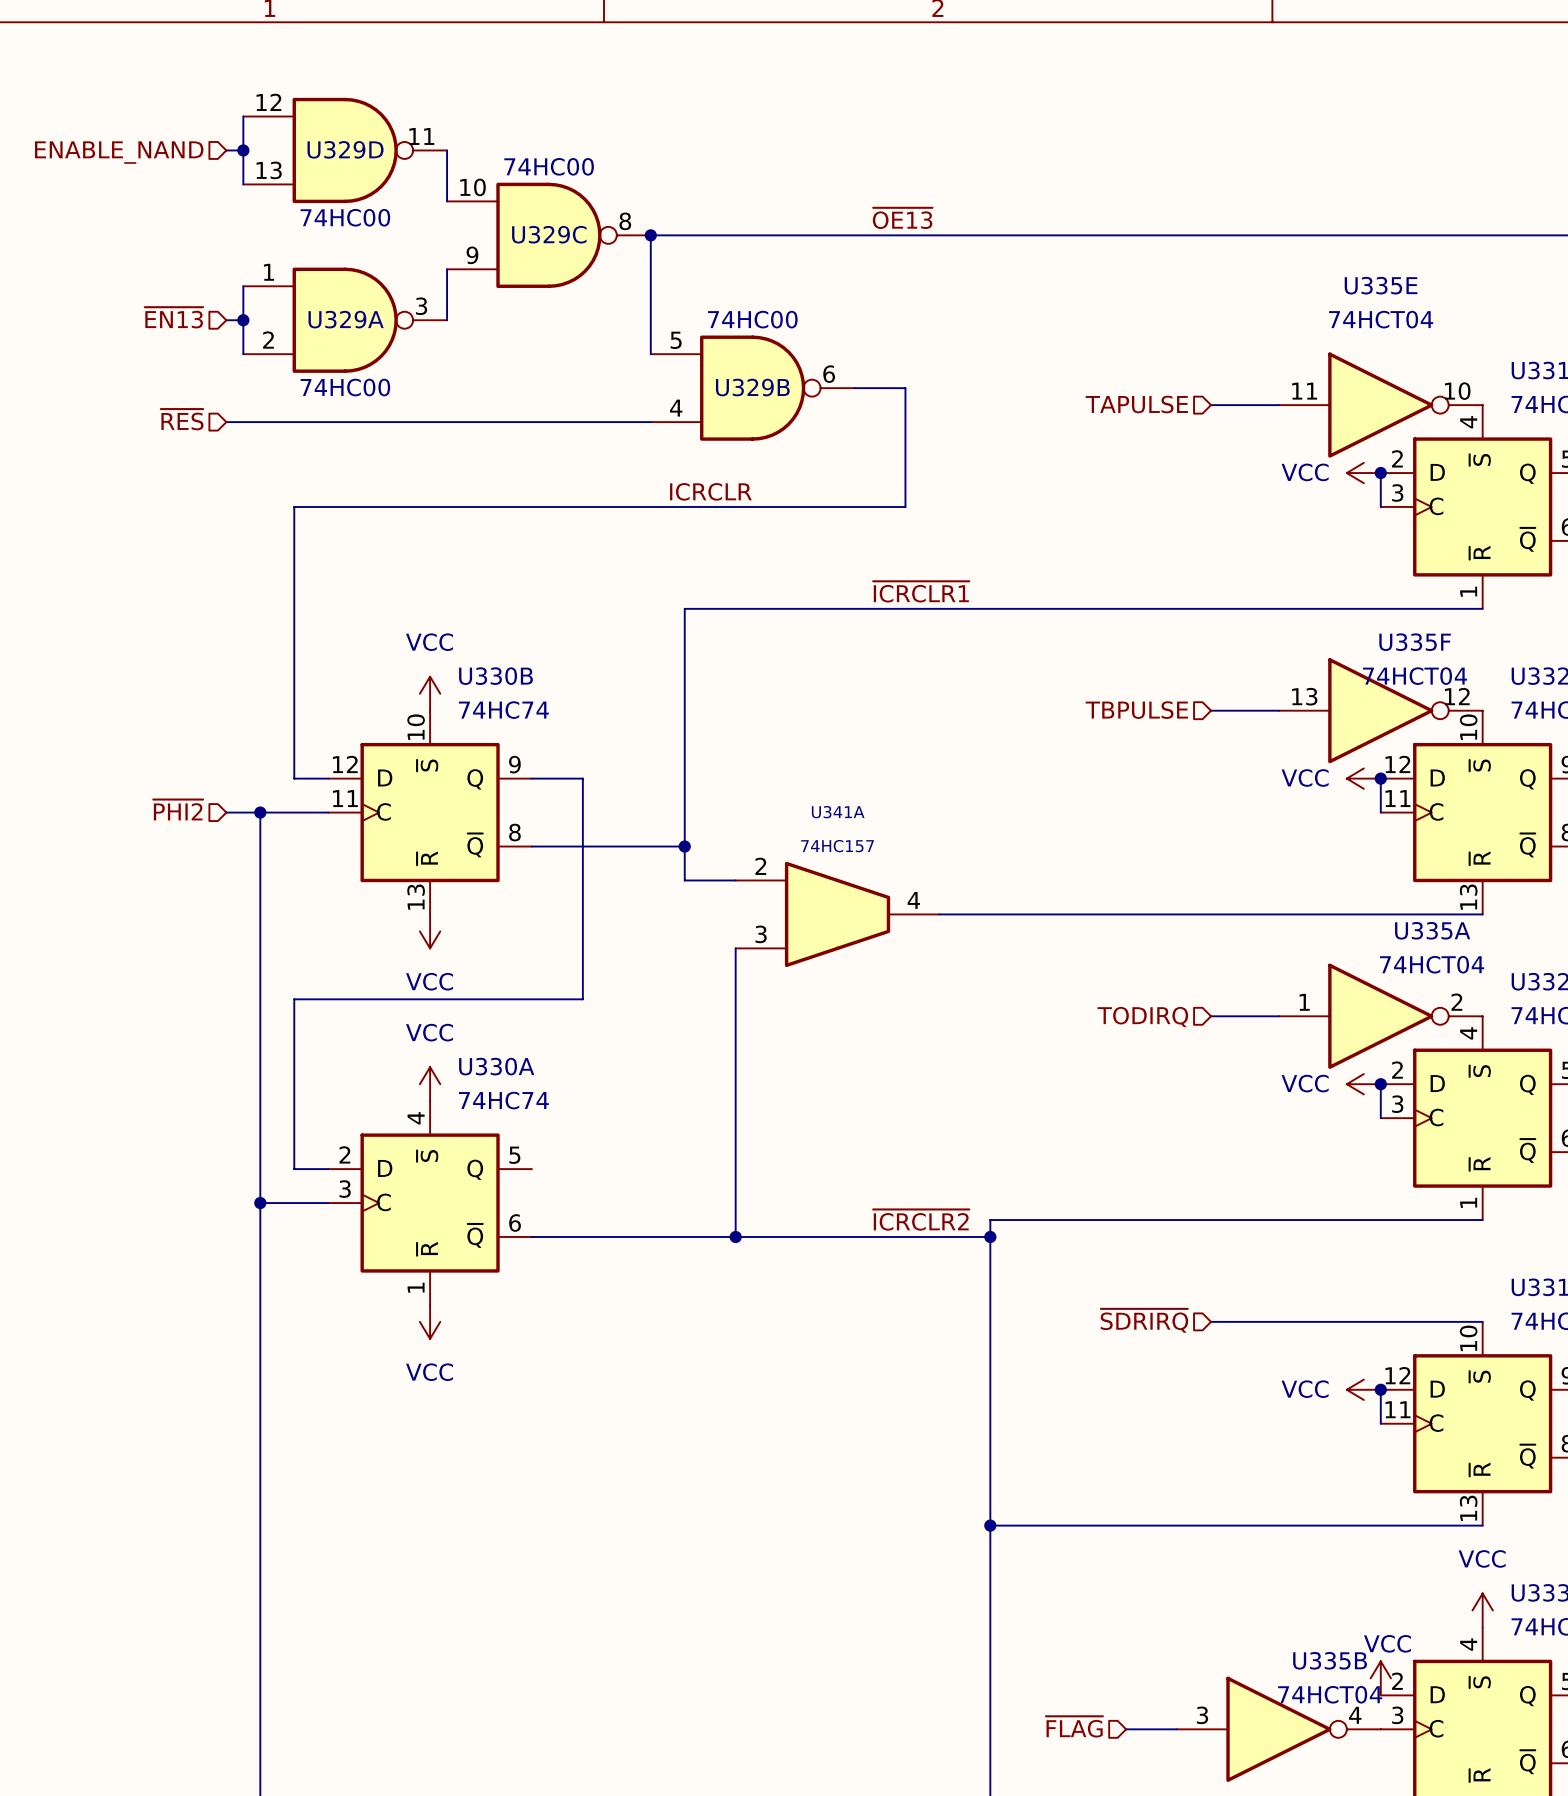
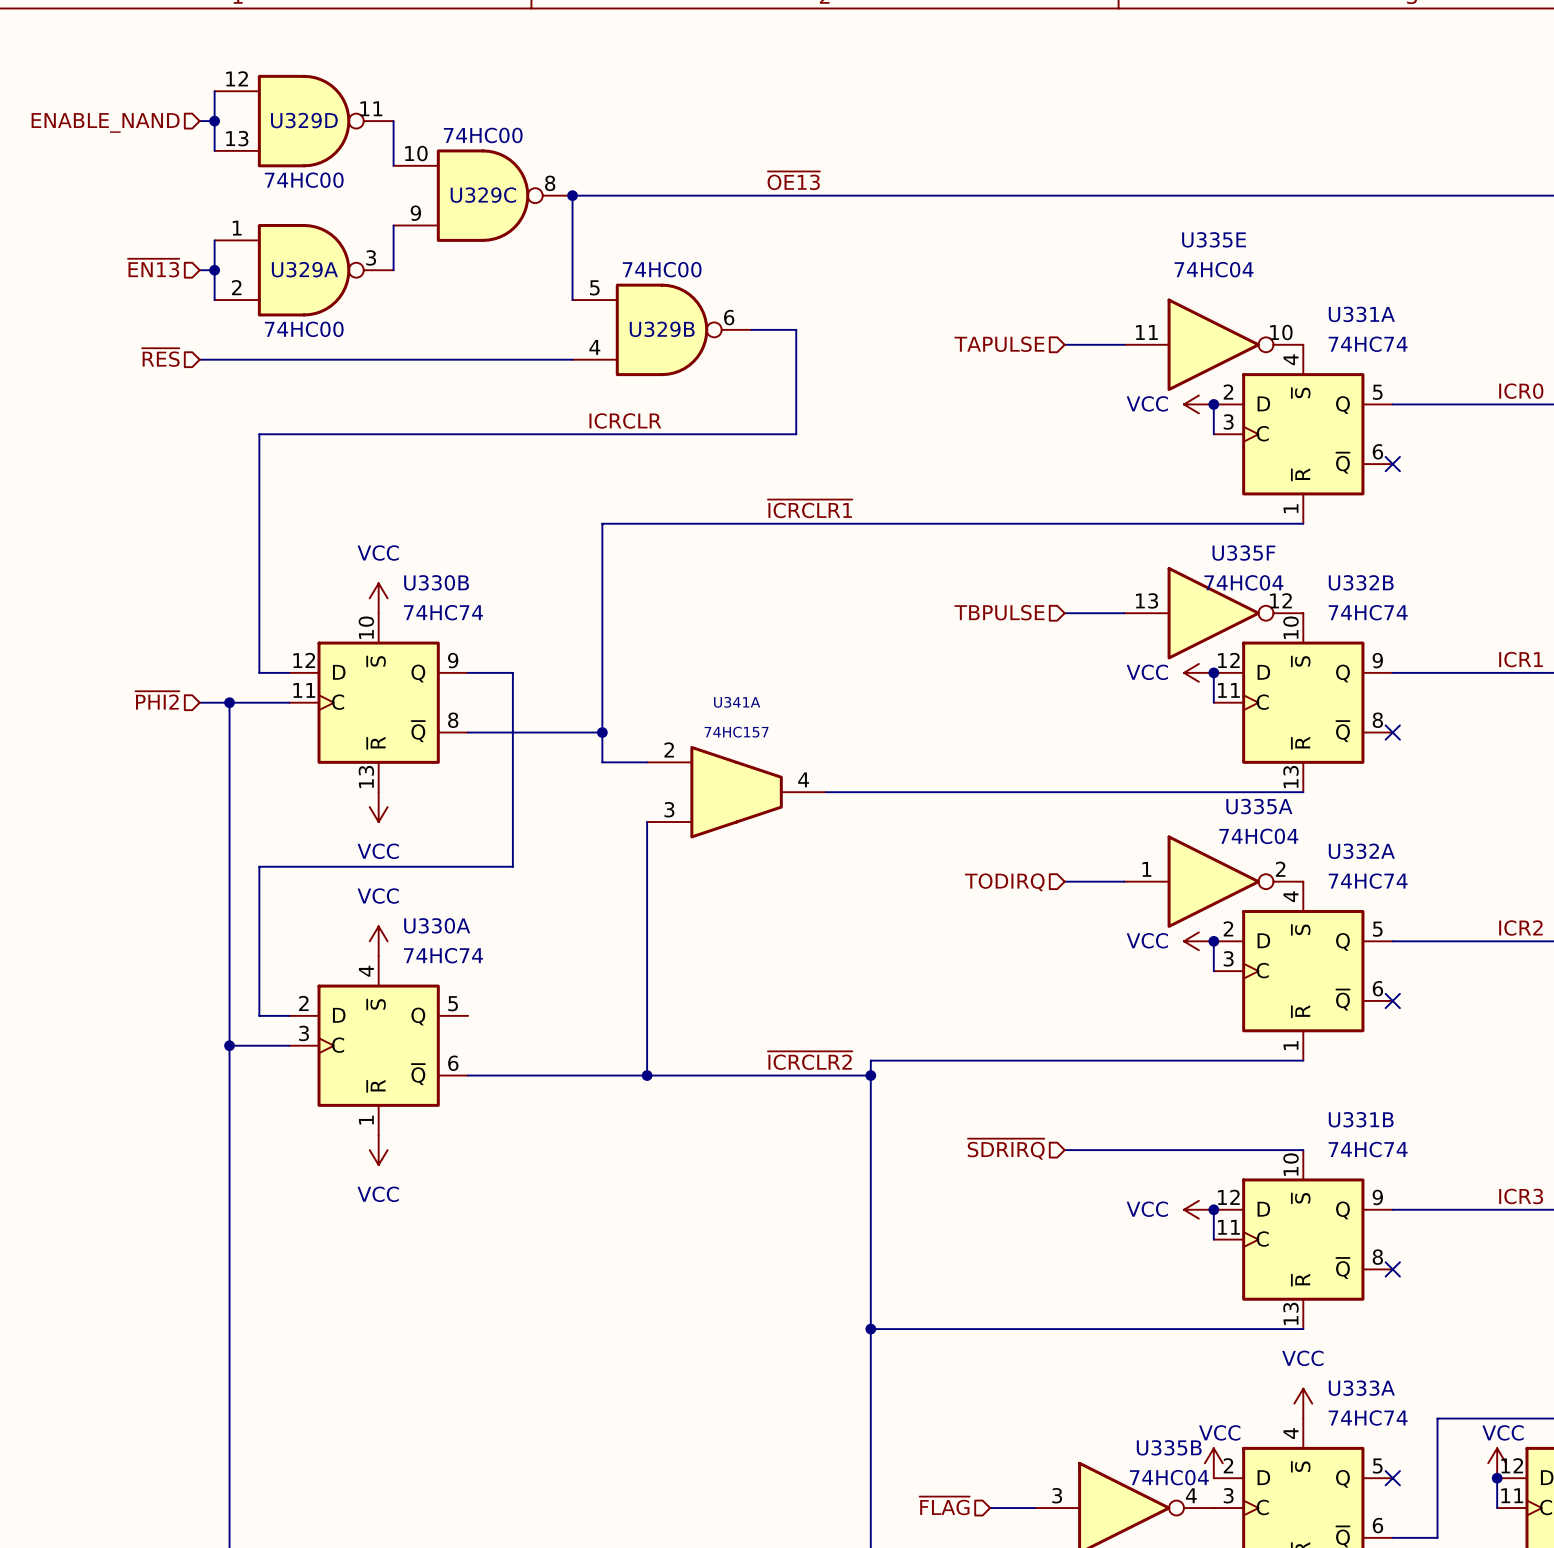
U335E value: 74HCT04 (1381, 319) -> 74HC04 (1214, 269)
U335F value: 74HCT04 (1415, 676) -> 74HC04 (1243, 582)
U335A value: 74HCT04 (1432, 964) -> 74HC04 (1258, 836)
U335B value: 74HCT04 (1330, 1694) -> 74HC04 (1169, 1477)

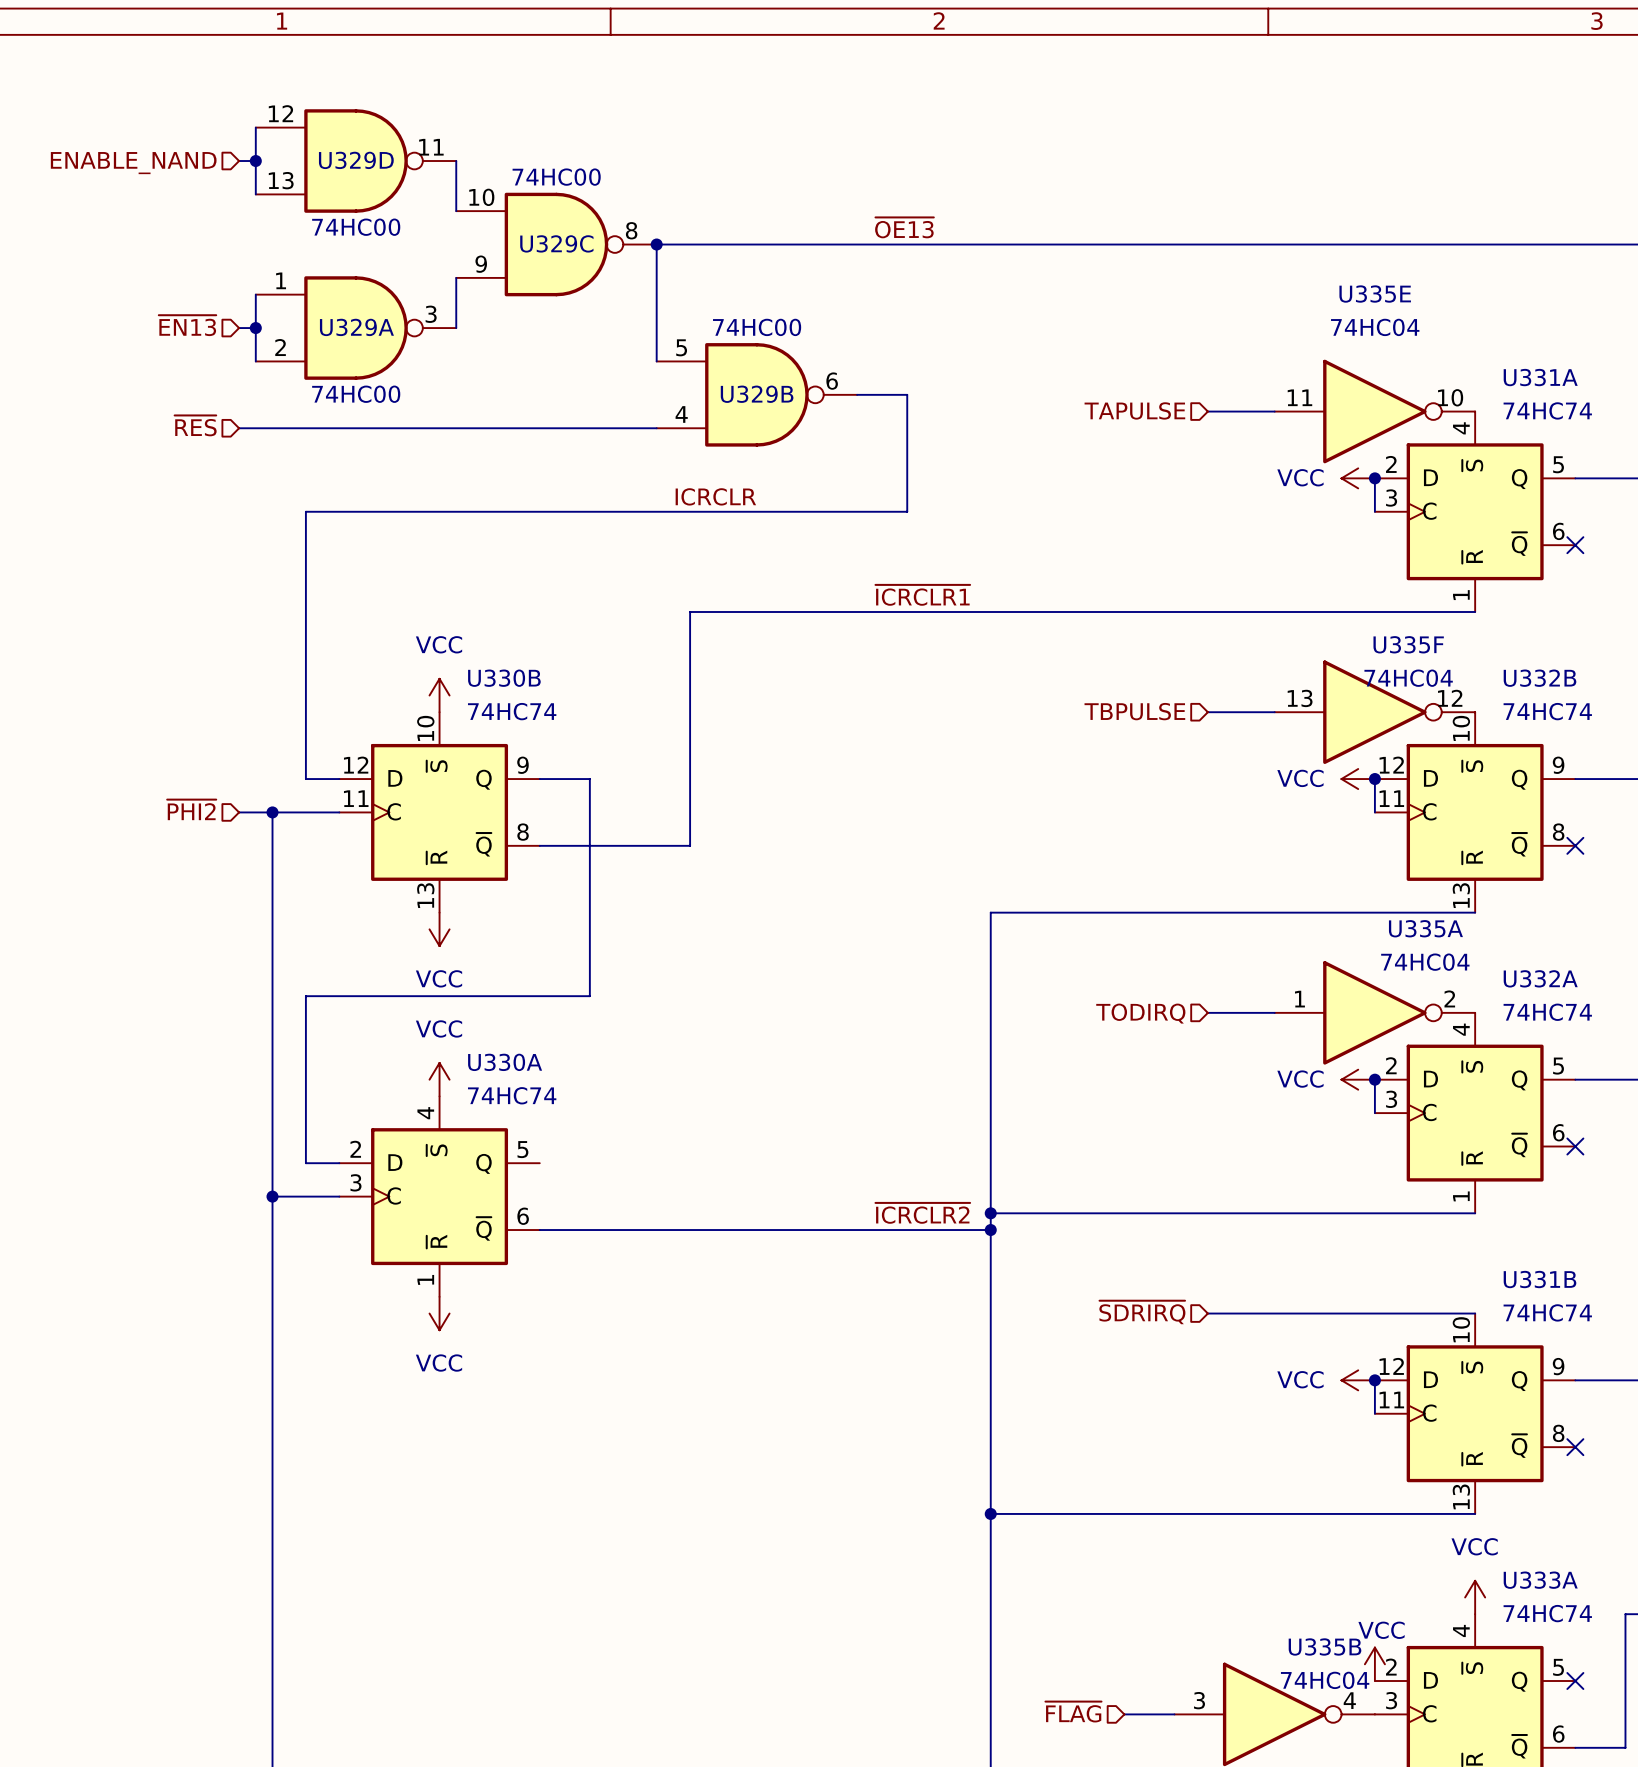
wire: (602, 732) (602, 762) (647, 762) -> none
junction: (602, 732) -> none
U341A: 74HC157 (736, 792) -> none
wire: (826, 792) (870, 792) -> (990, 1213) (990, 912)
wire: (647, 822) (647, 1075) -> none
junction: none -> (990, 1213)
junction: (647, 1075) -> none

